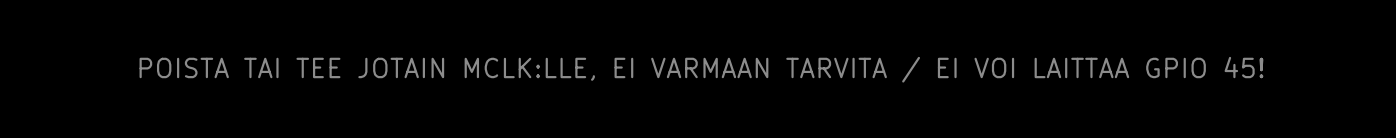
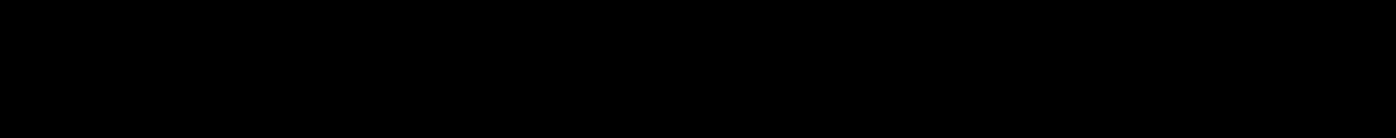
text: POISTA TAI TEE JOTAIN MCLK:LLE, EI VARMAAN TARVITA / EI VOI LAITTAA GPIO 45! (701, 69) -> none

